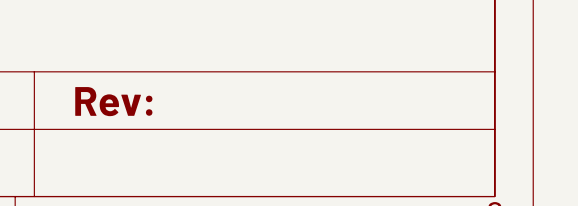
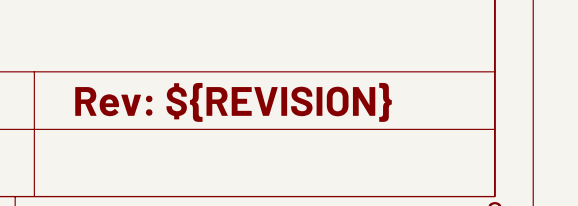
title block: Rev: (113, 101) -> Rev: ${REVISION} (233, 102)

